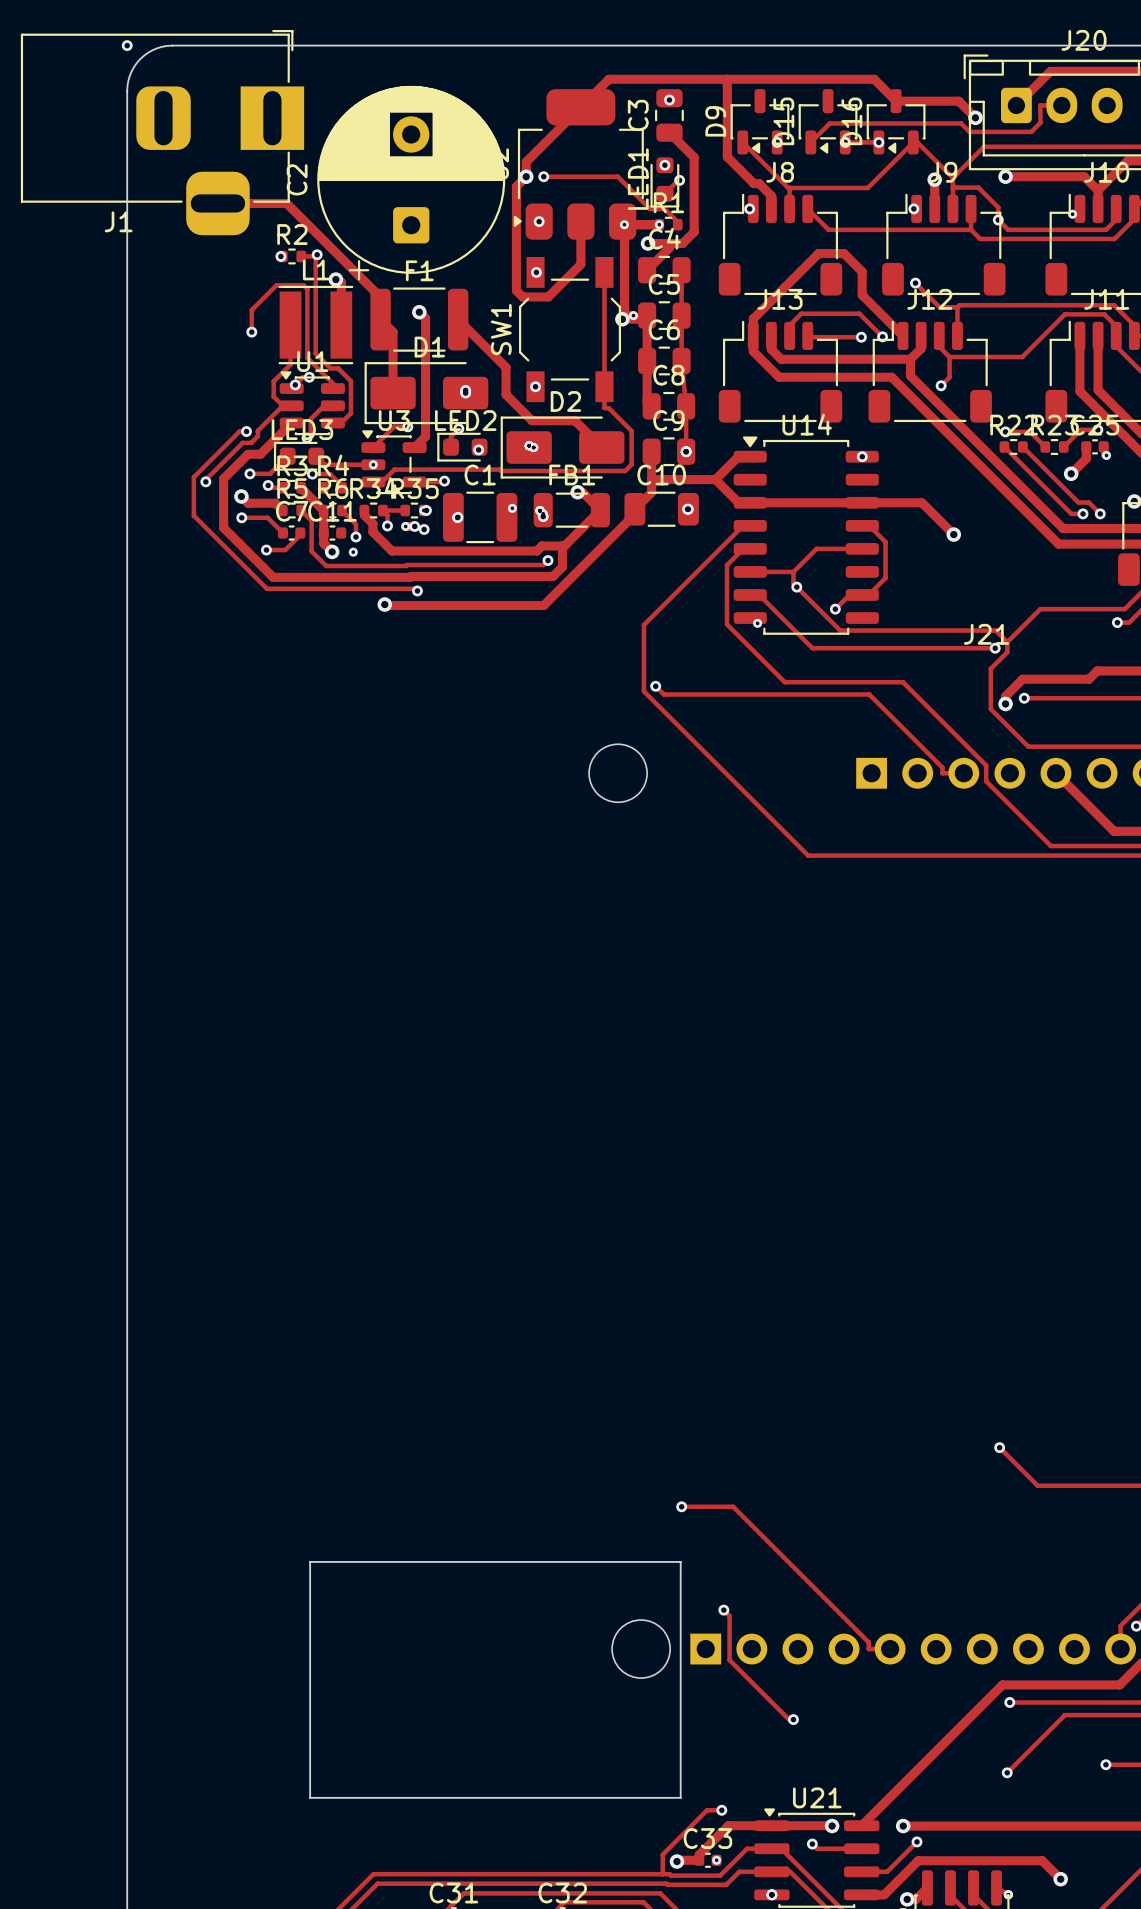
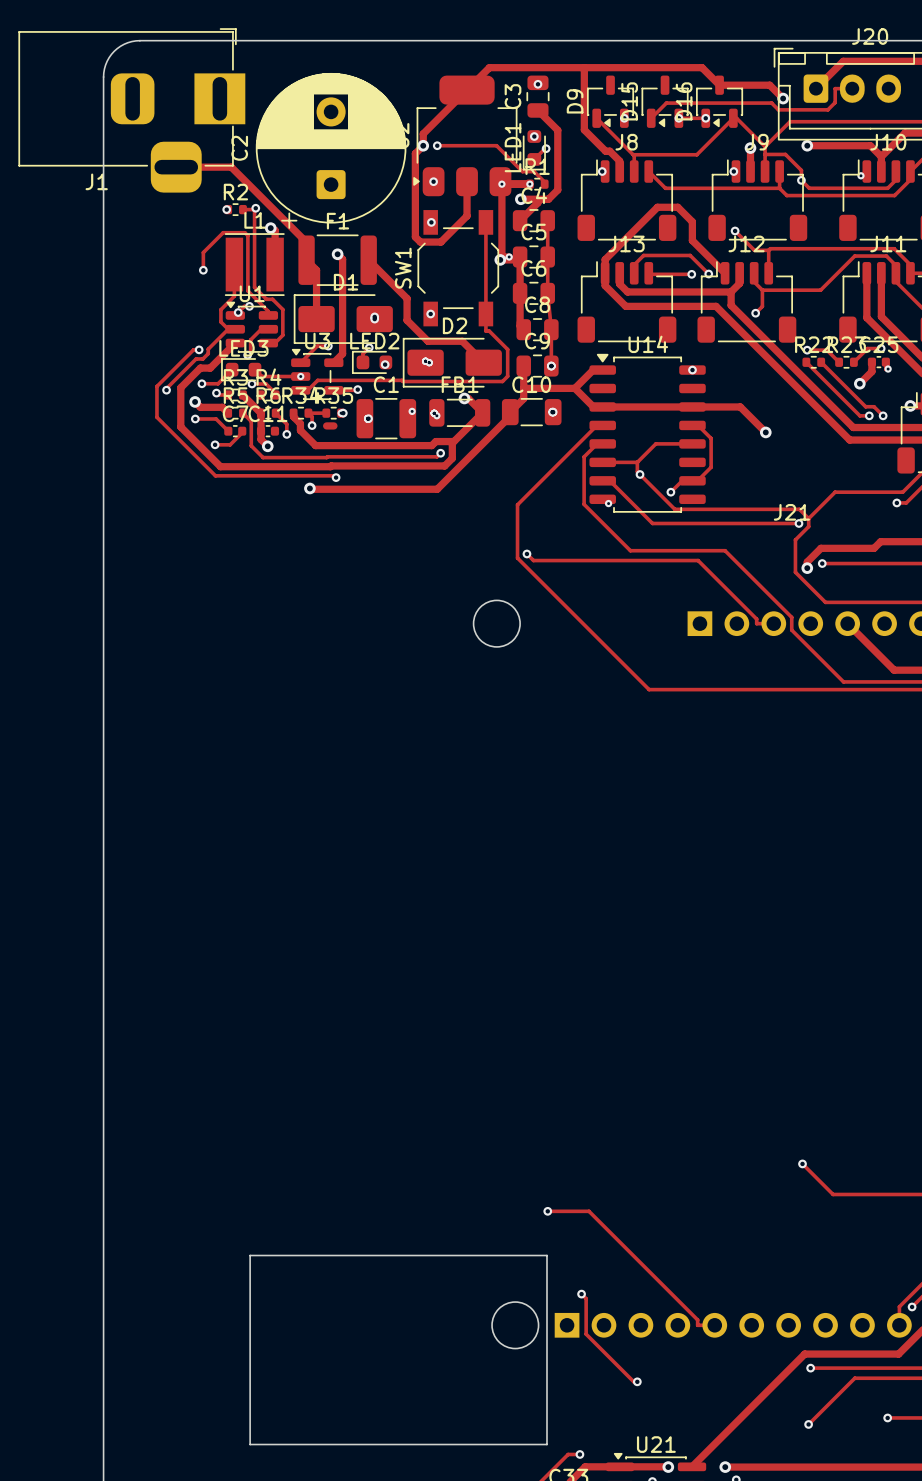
via: (127, 45) -> none
via: (543, 516) -> none
via: (405, 526) -> none
via: (414, 526) -> none
via: (424, 529) -> none
via: (353, 552) -> none

